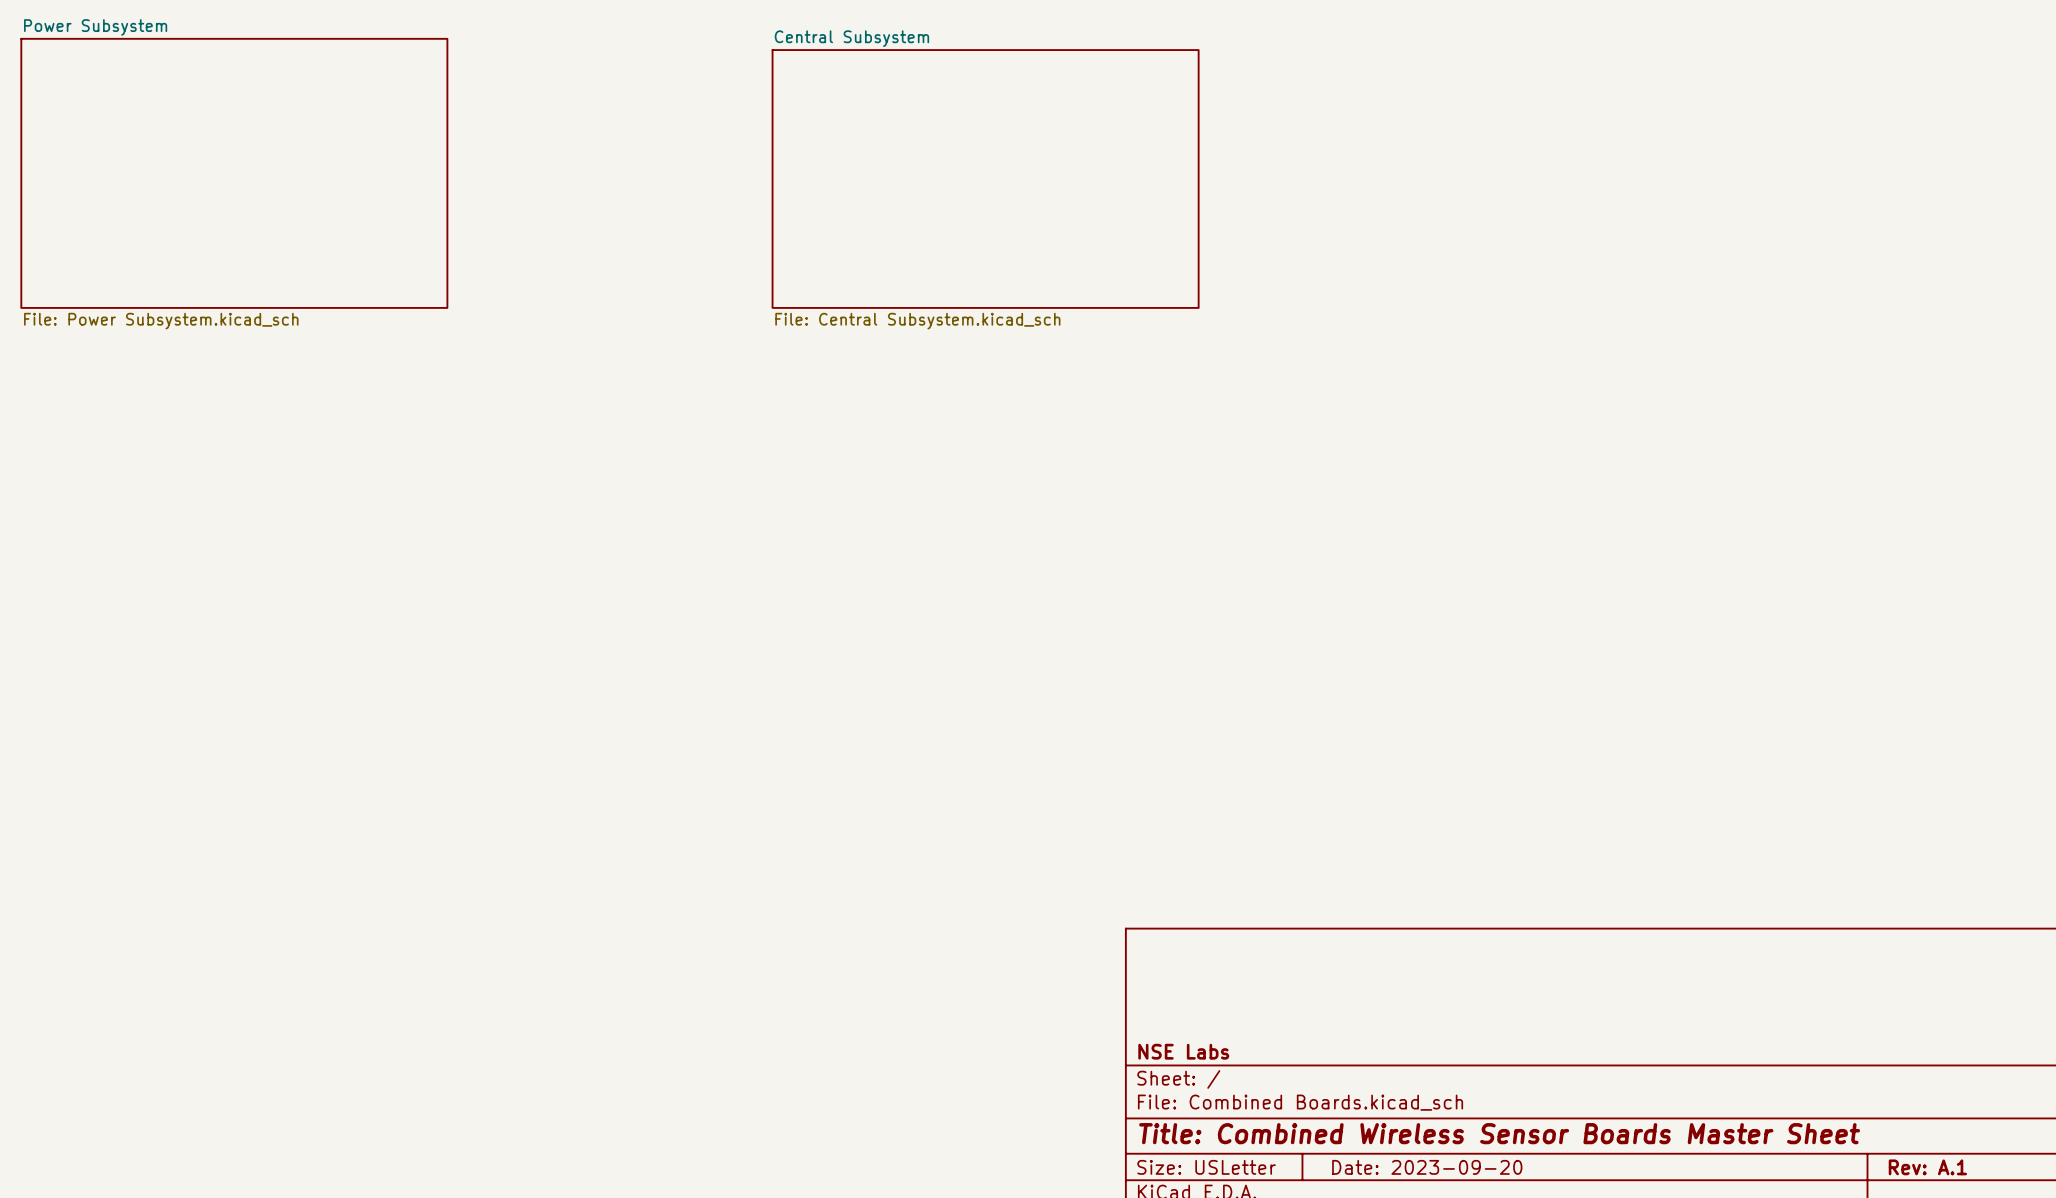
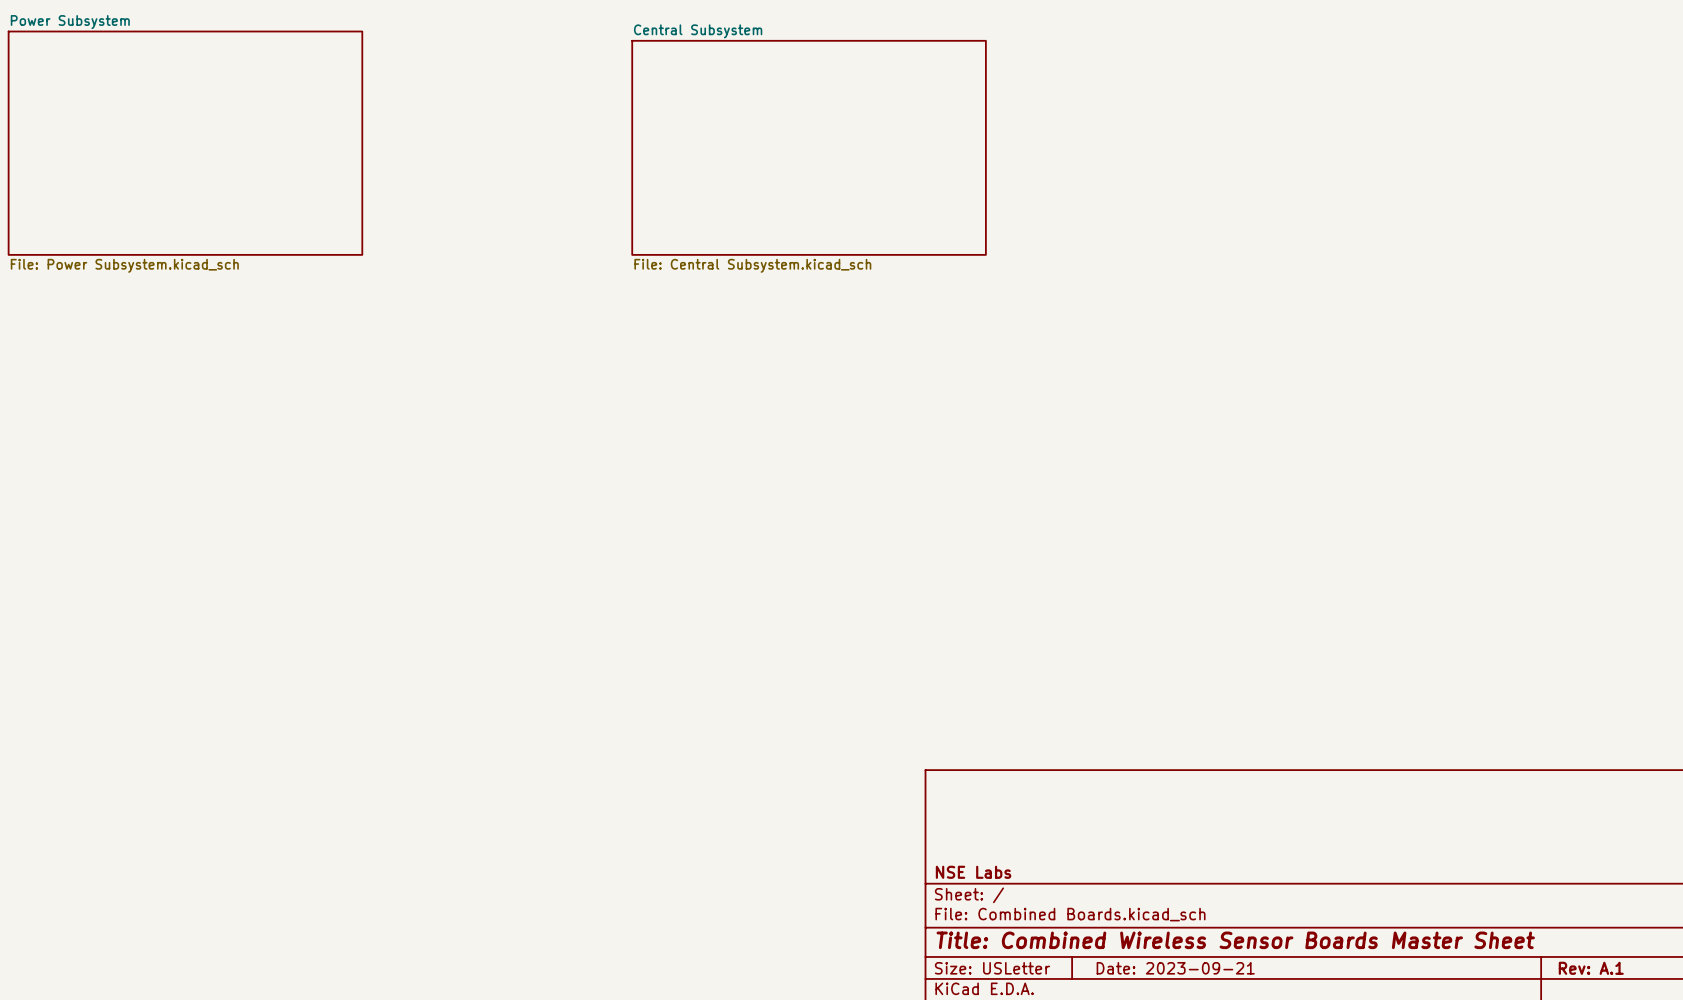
title block: Date: 2023-09-20 (1427, 1167) -> Date: 2023-09-21 (1175, 968)

